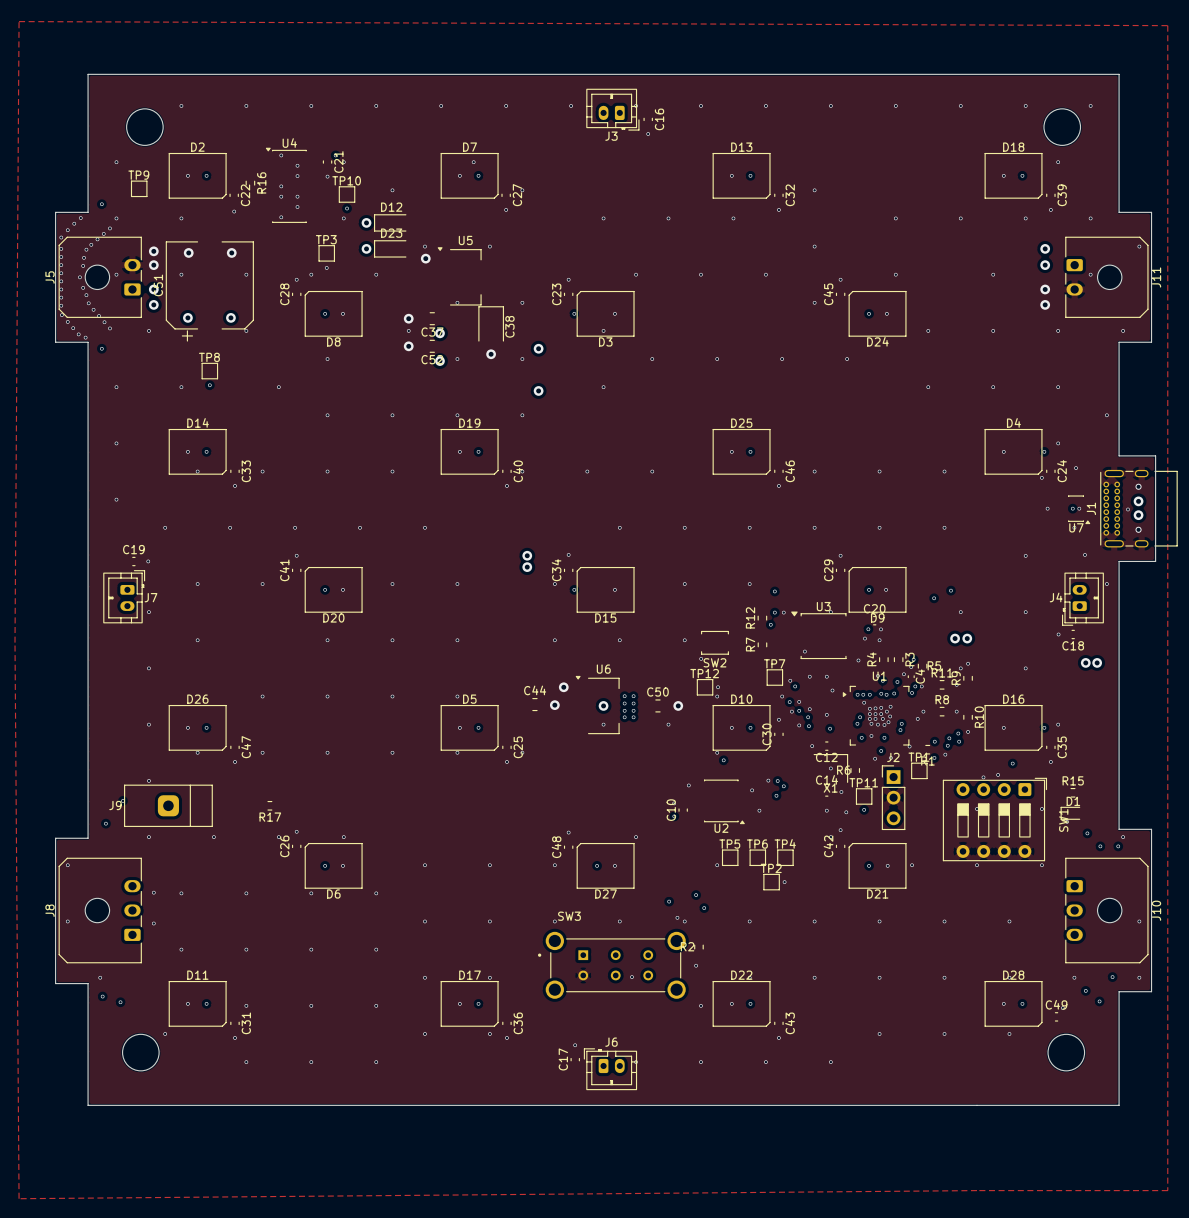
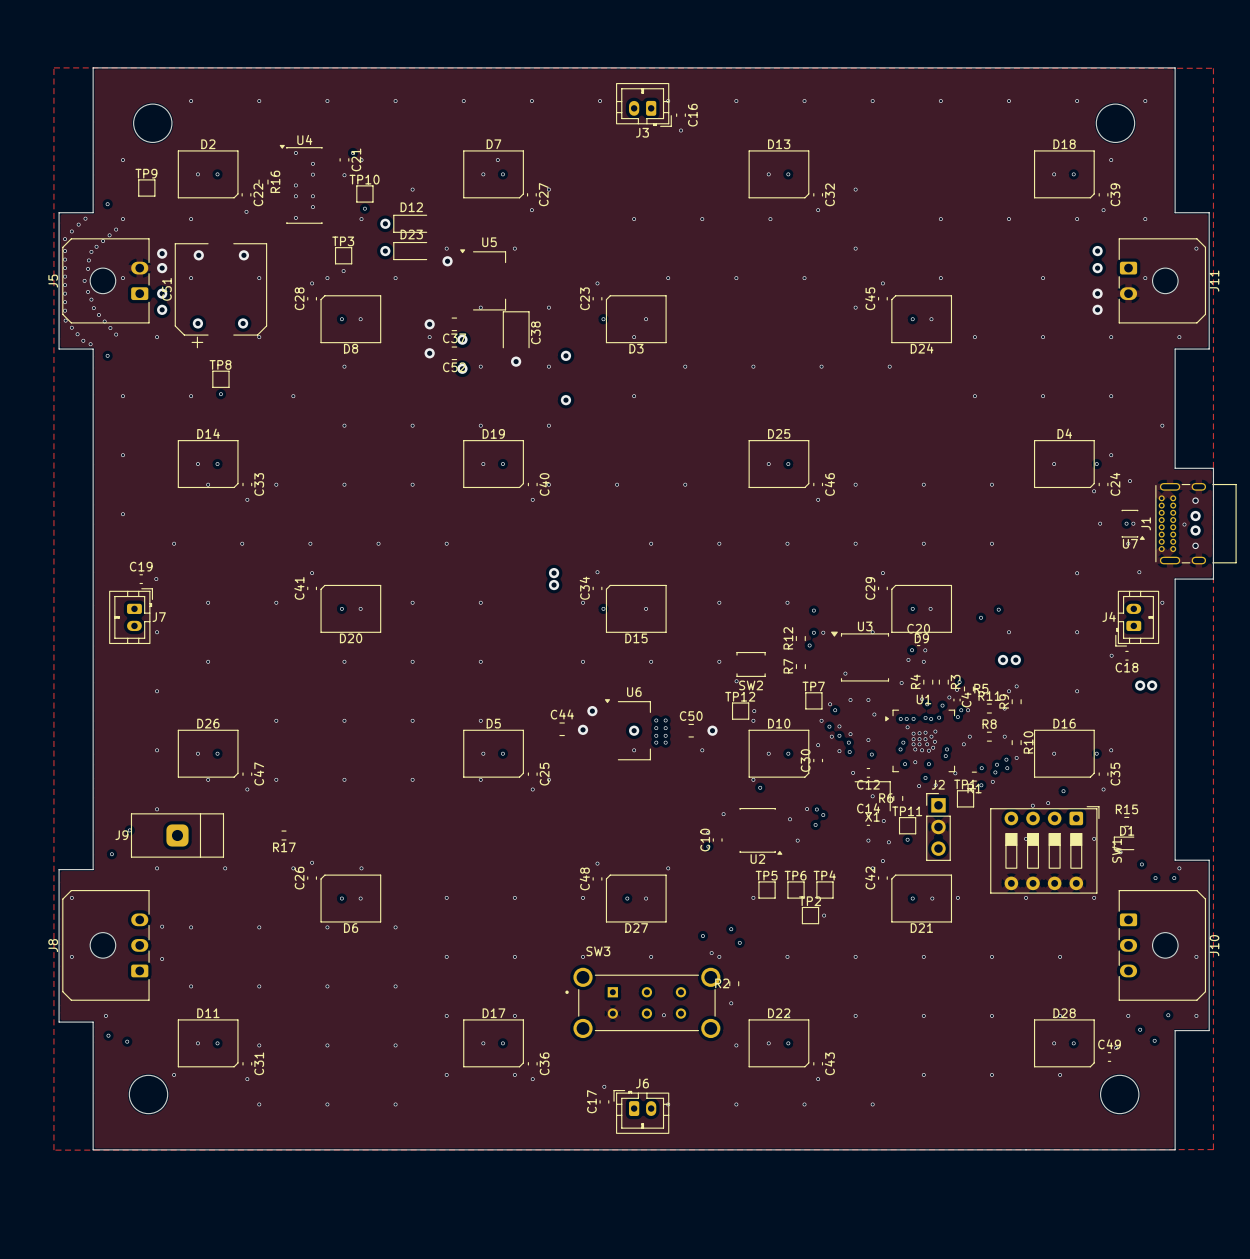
zone outline: (19, 21) (15, 642) (19, 1198) (1167, 1190) (1167, 25) (19, 21) -> (53, 67) (53, 1150) (1213, 1149) (1213, 68) (53, 67)

